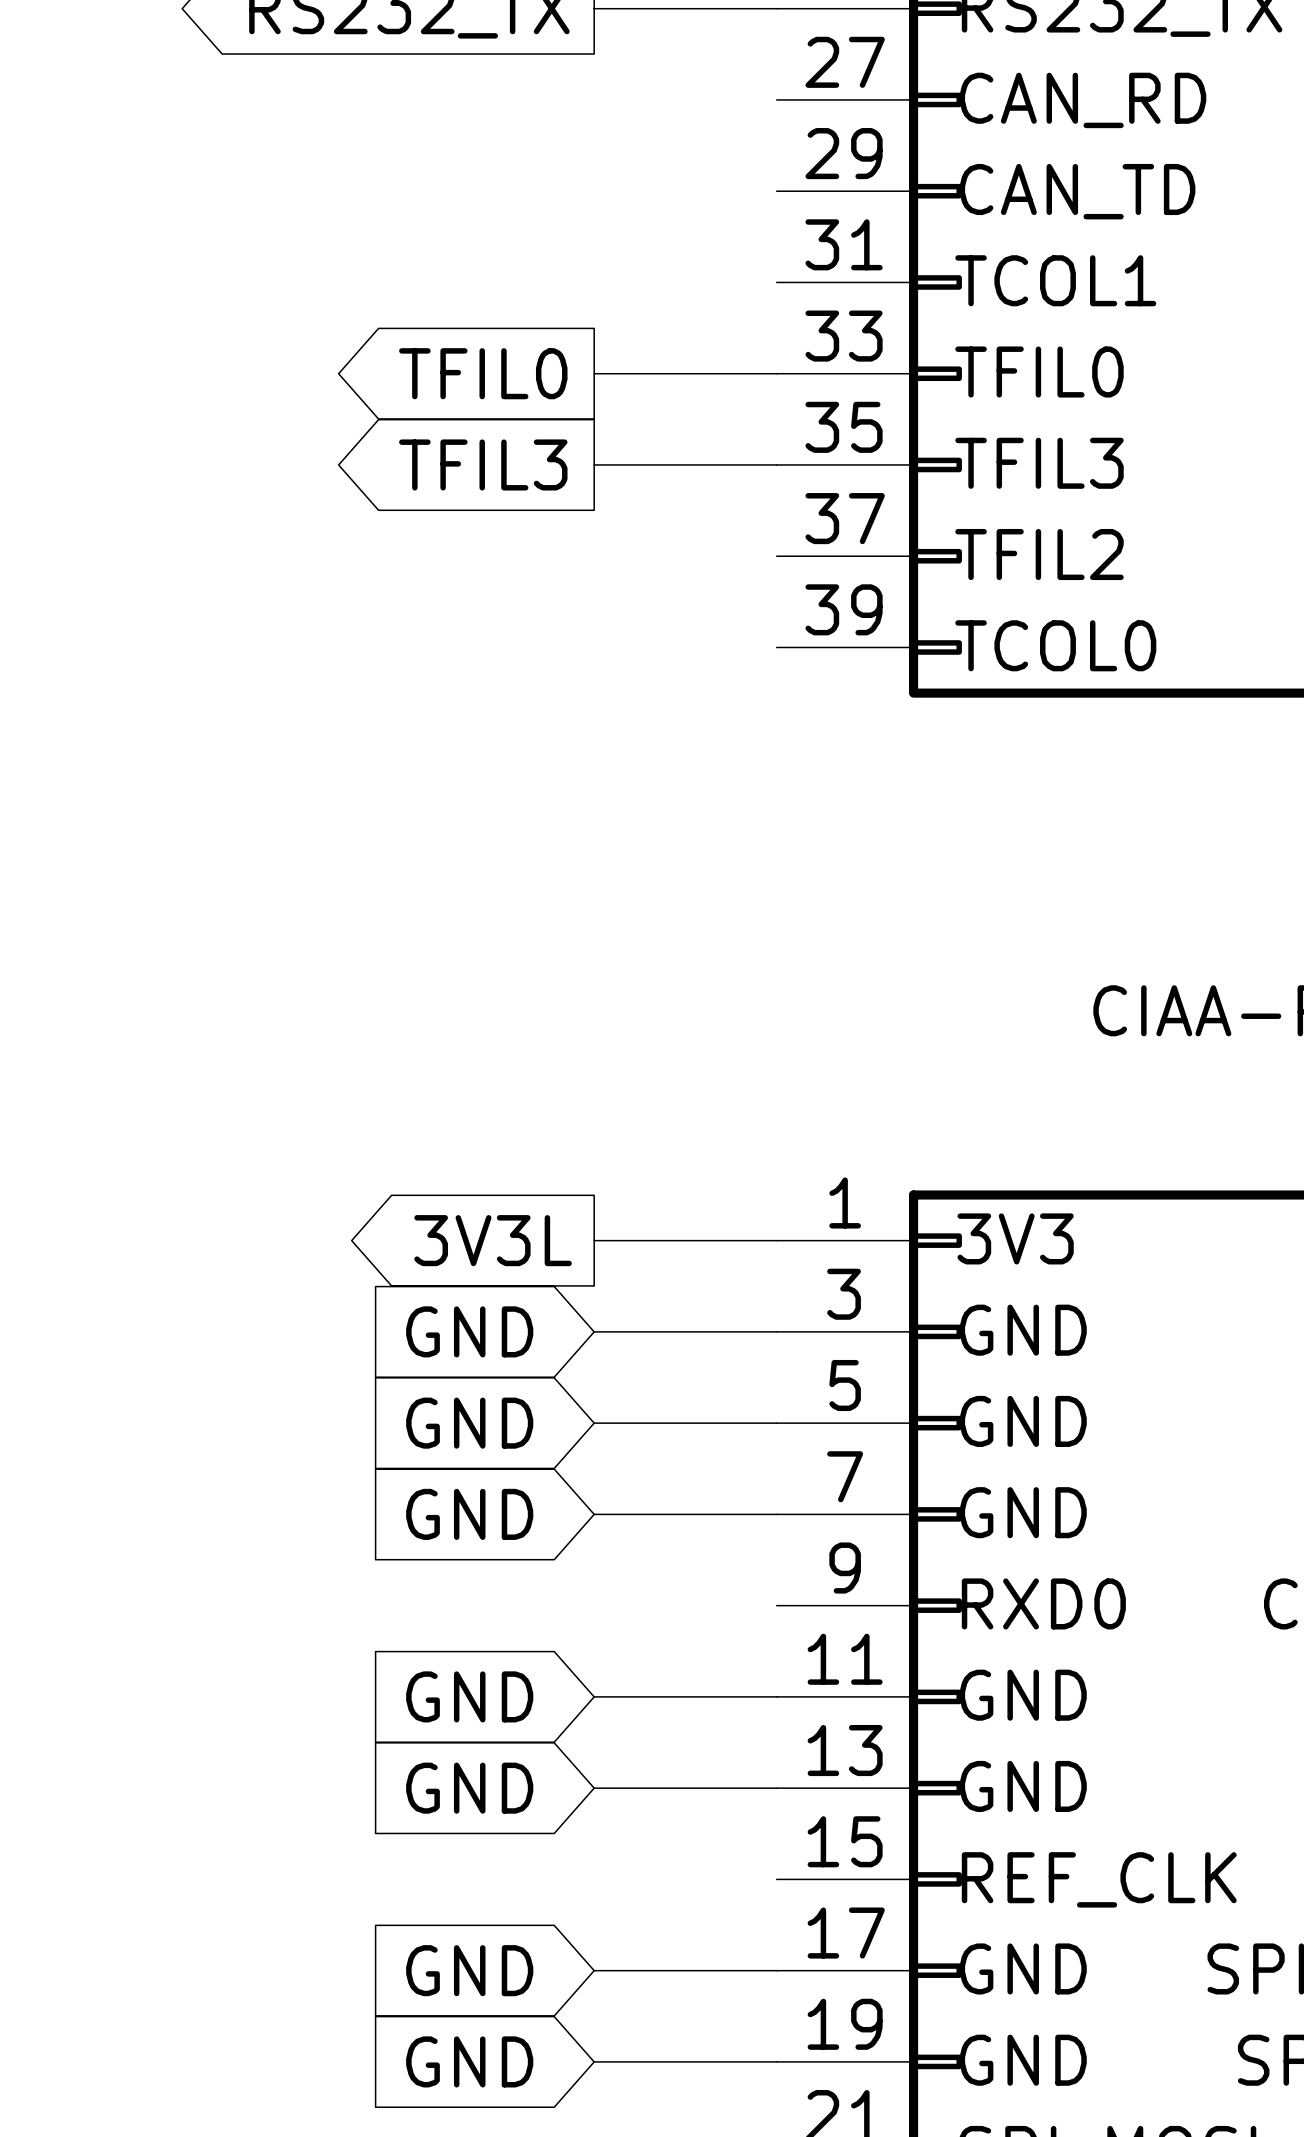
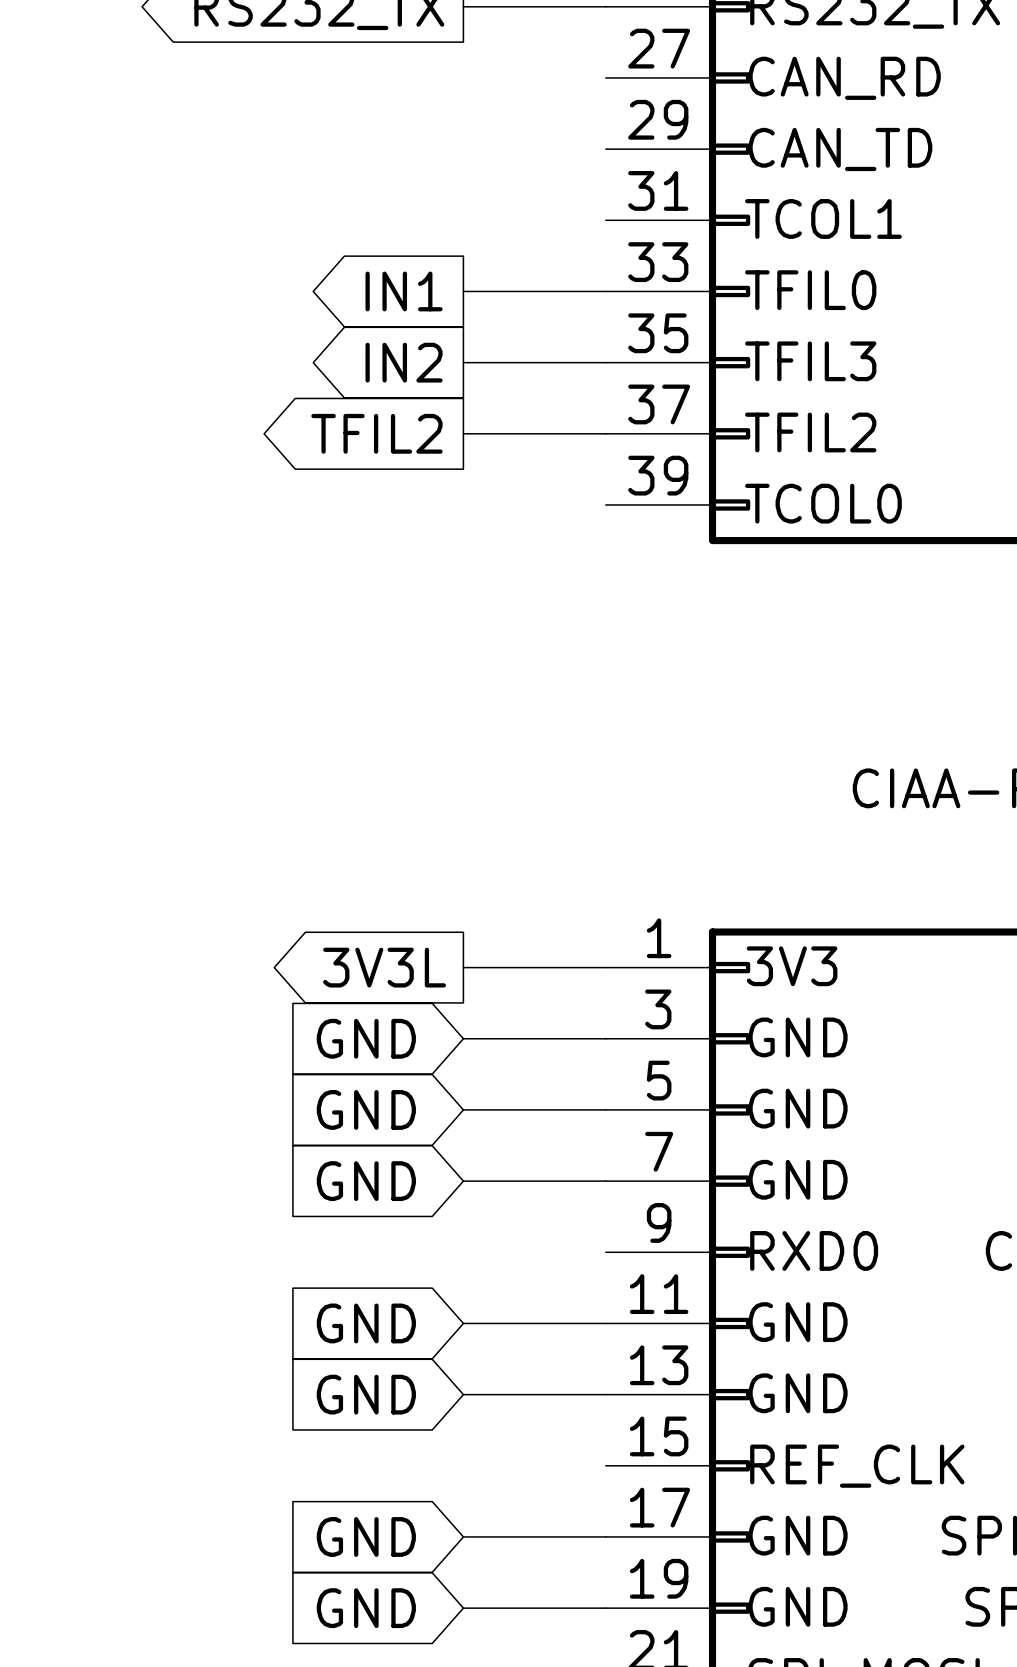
global label: TFIL0 (483, 373) -> IN1 (404, 291)
global label: TFIL3 (483, 464) -> IN2 (404, 362)
global label: none -> TFIL2 (376, 433)
wire: none -> (463, 433) (605, 433)

